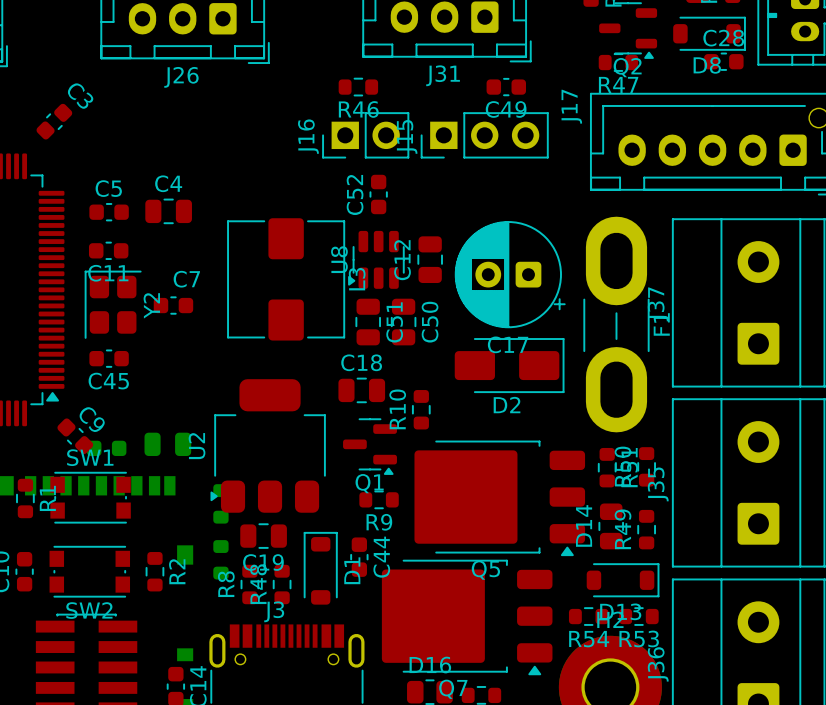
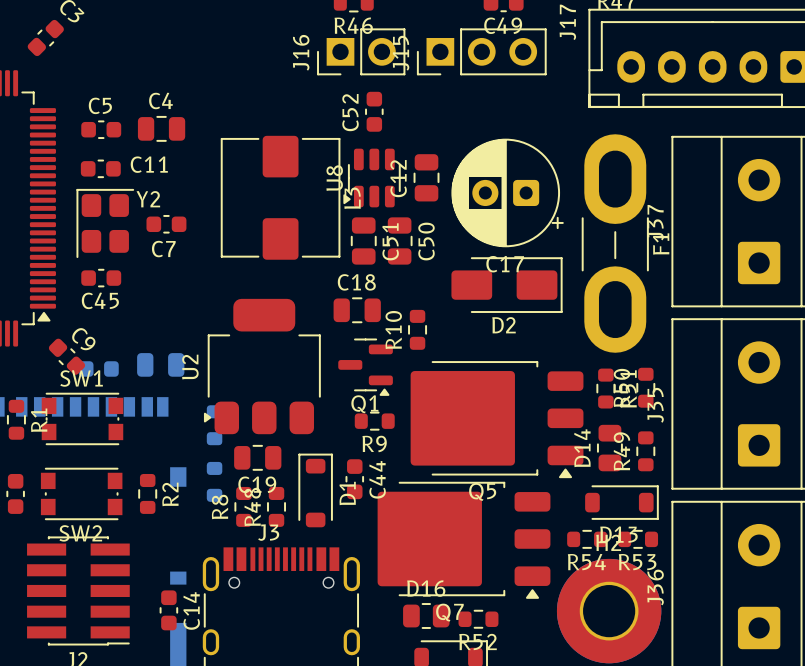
C11 name position: C11 (108, 273) -> C11 (149, 164)
C7 name position: C7 (186, 279) -> C7 (163, 249)
Y2 name rotation: 0° (151, 305) -> 90° clockwise (148, 199)

